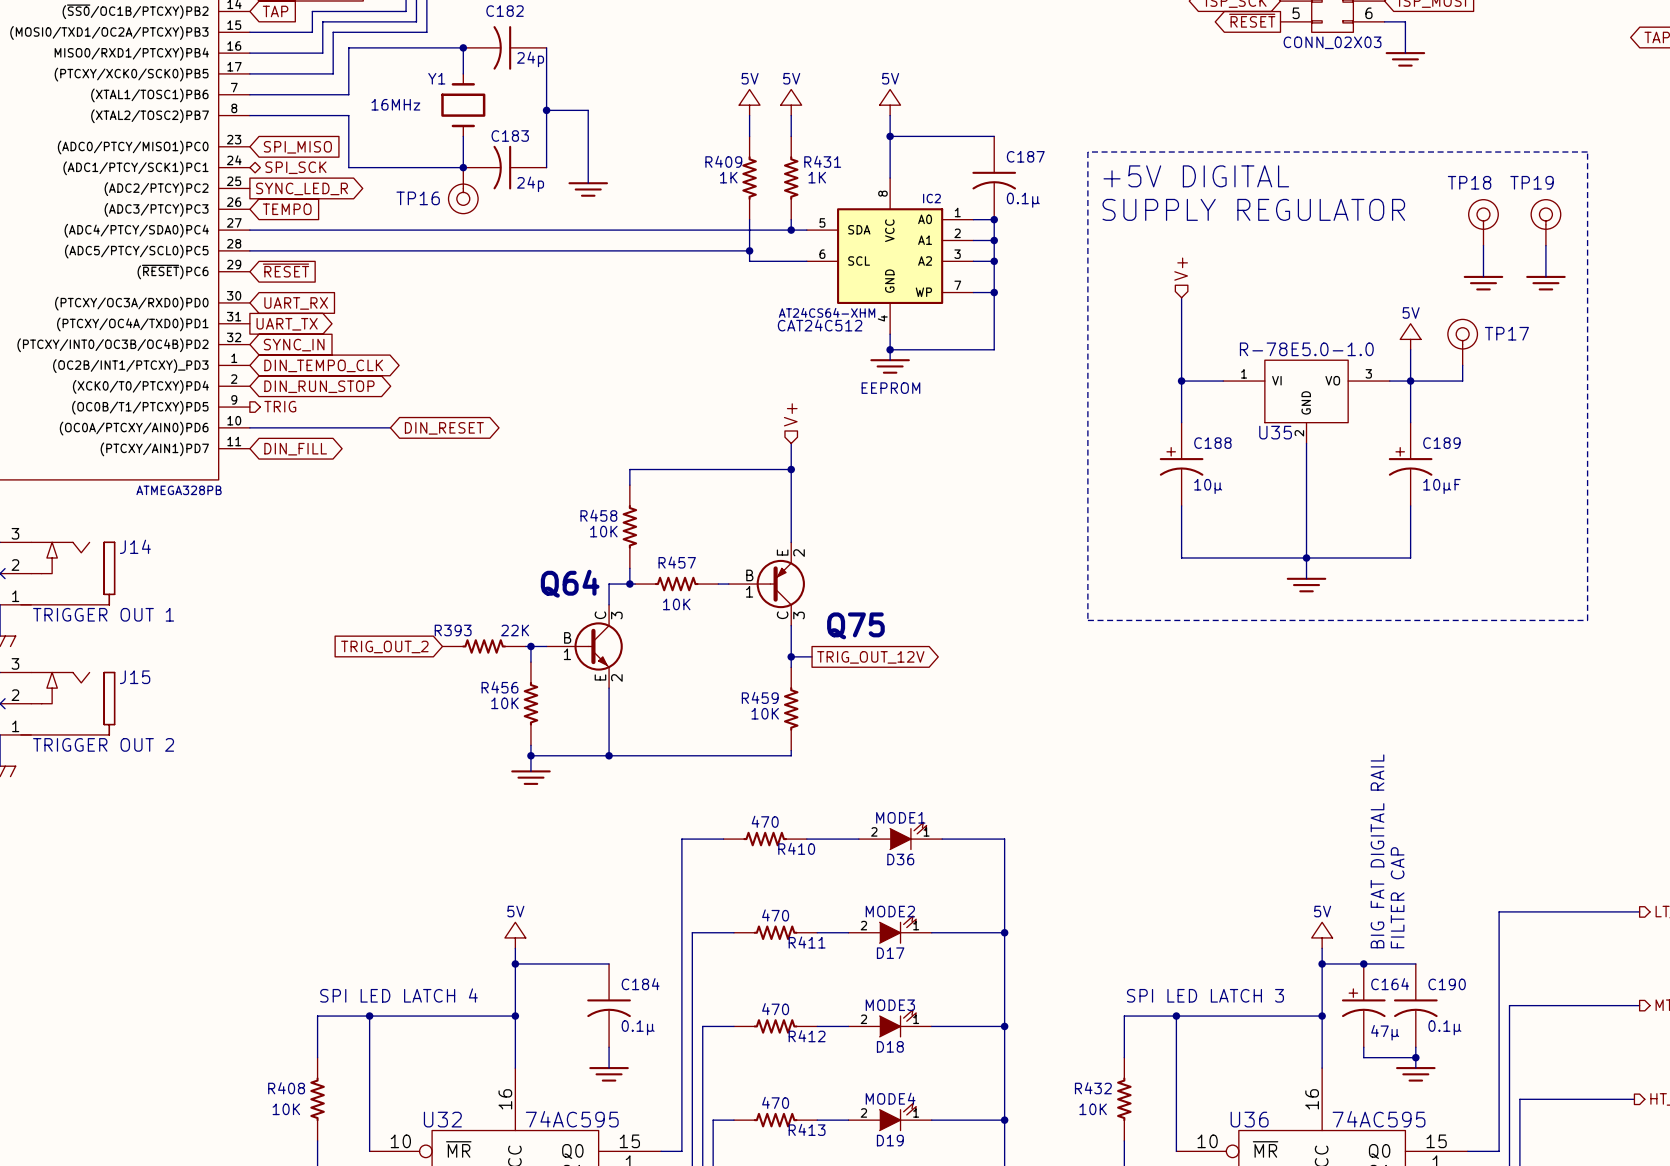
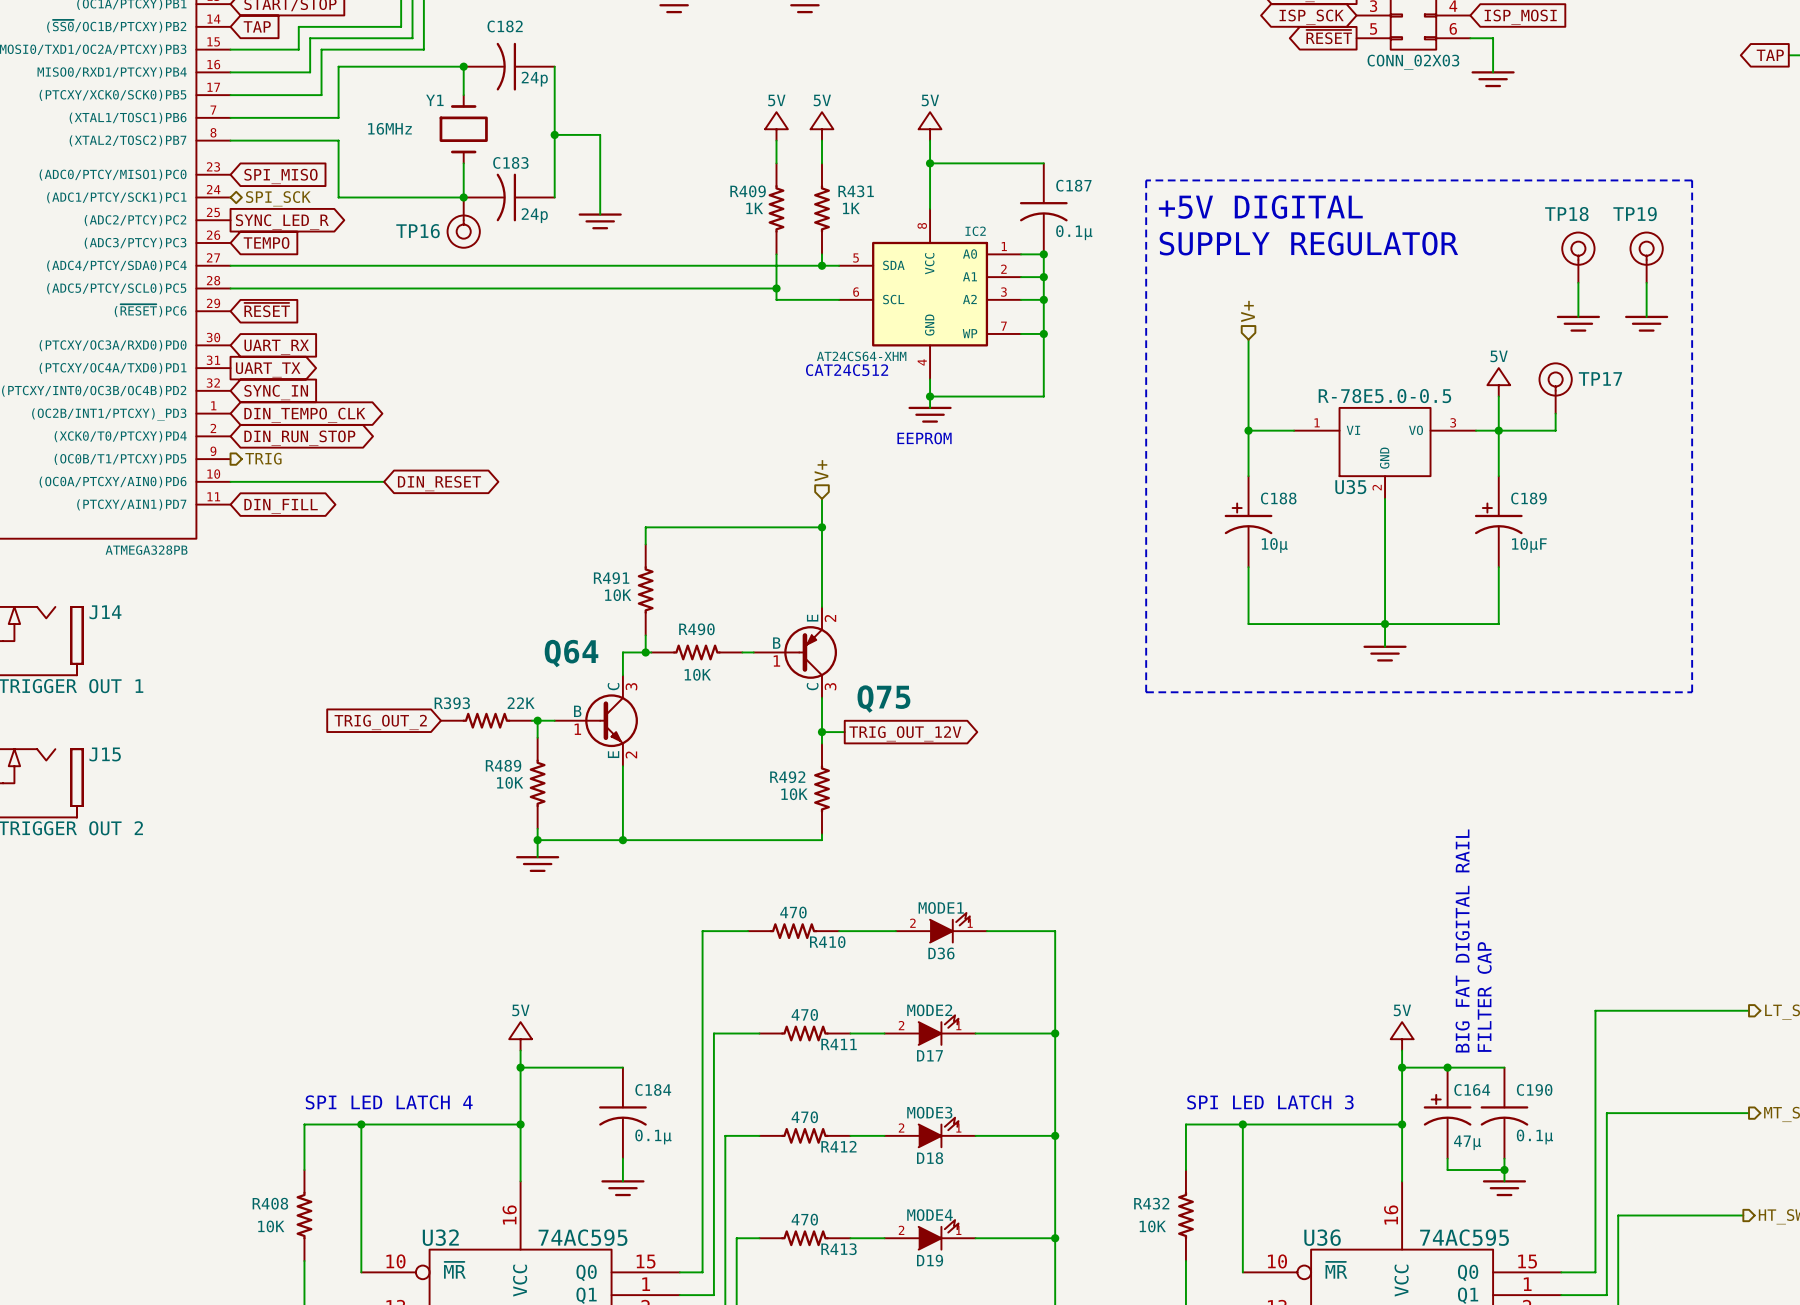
U35 value: R-78E5.0-1.0 (1306, 349) -> R-78E5.0-0.5 (1384, 396)
R458 name: R458 (598, 515) -> R491 (611, 578)
R457 name: R457 (677, 562) -> R490 (696, 629)
R456 name: R456 (499, 687) -> R489 (503, 765)
R459 name: R459 (760, 697) -> R492 (787, 777)

